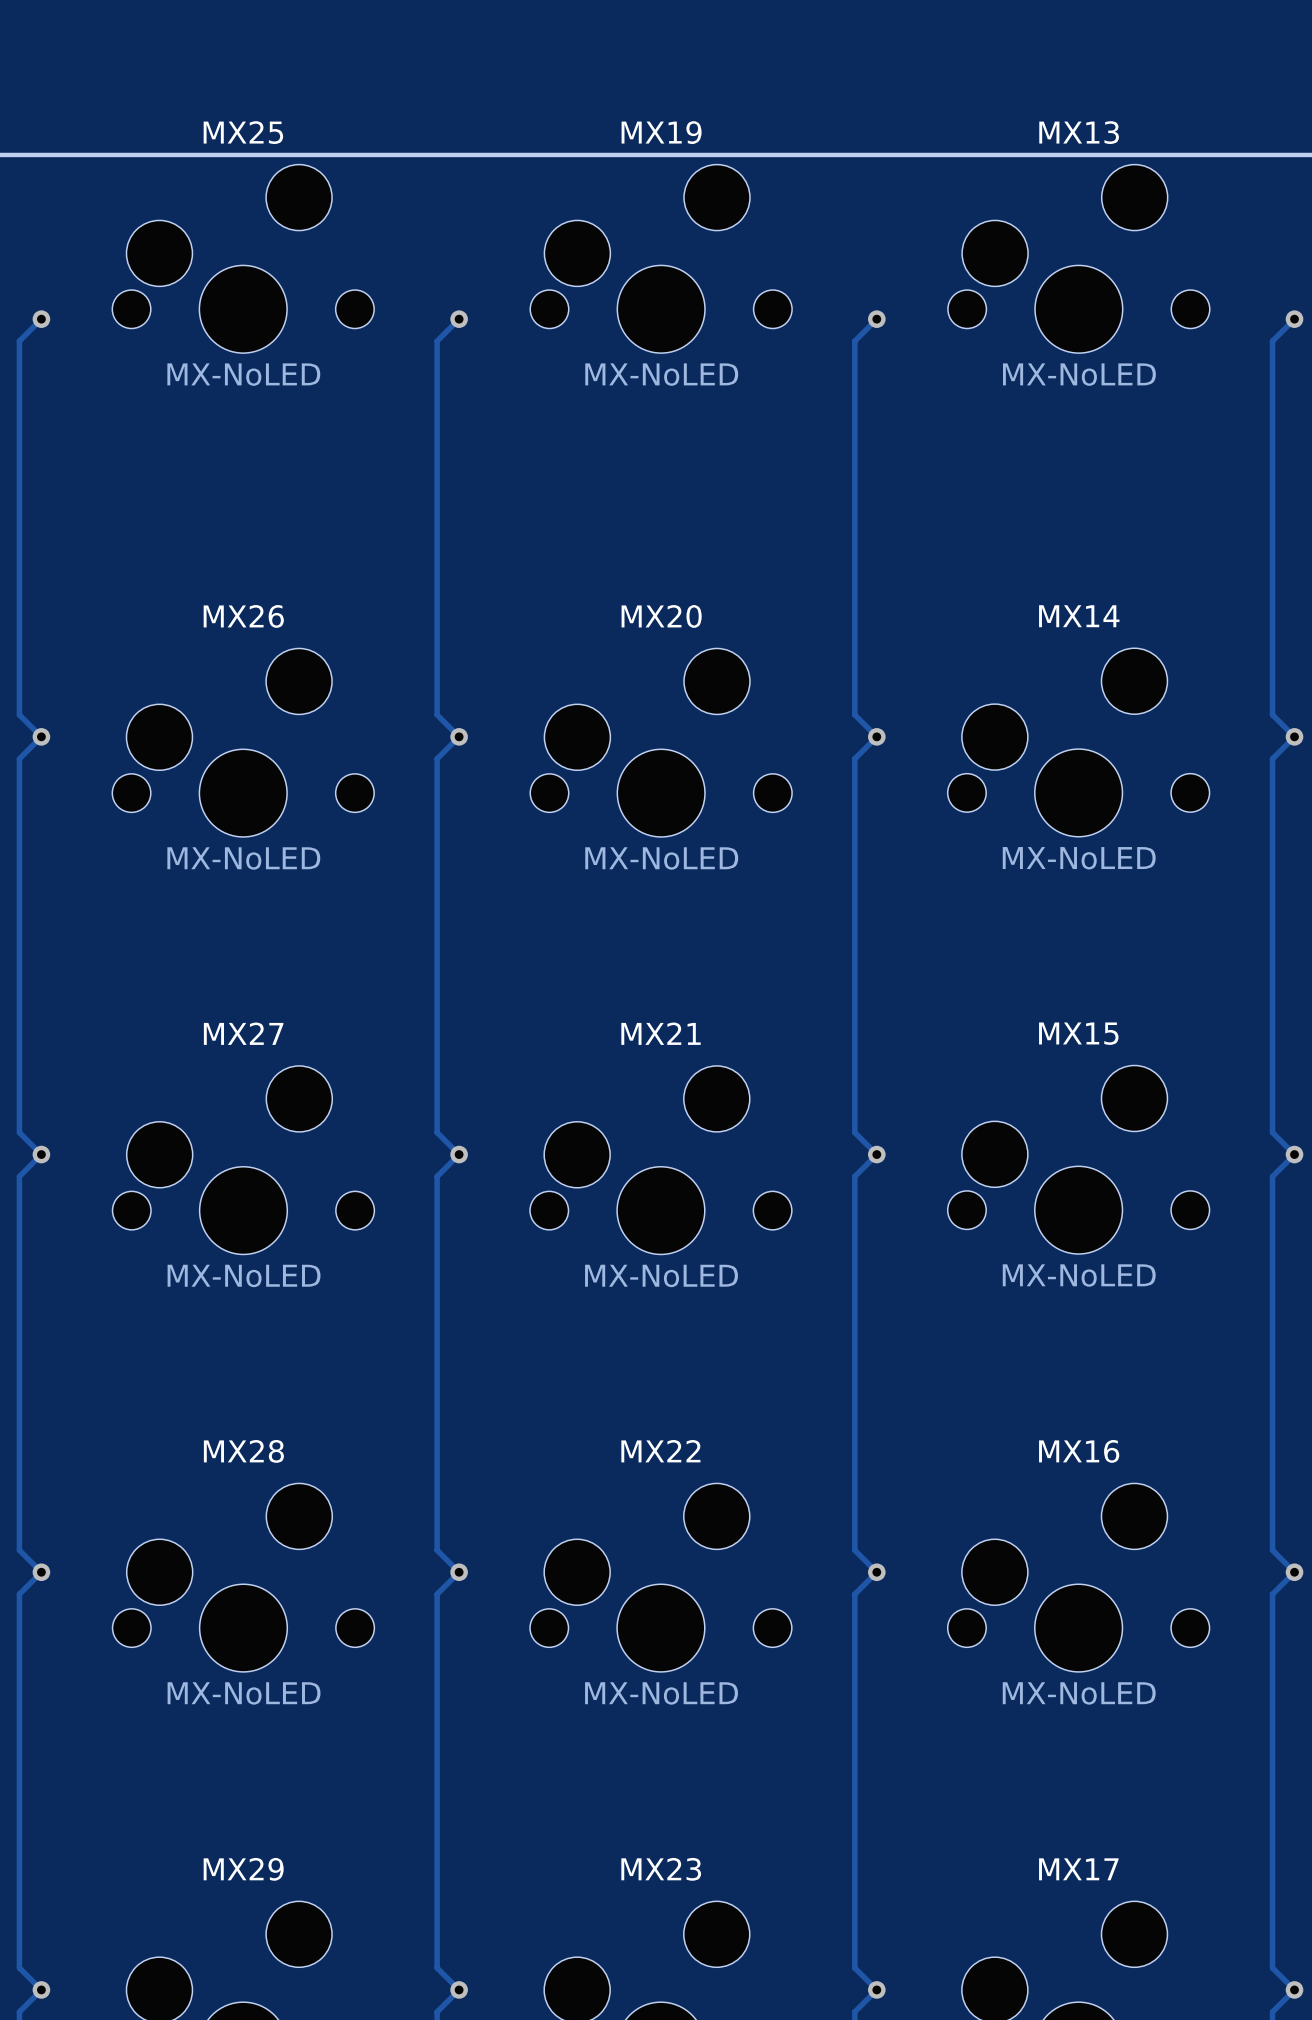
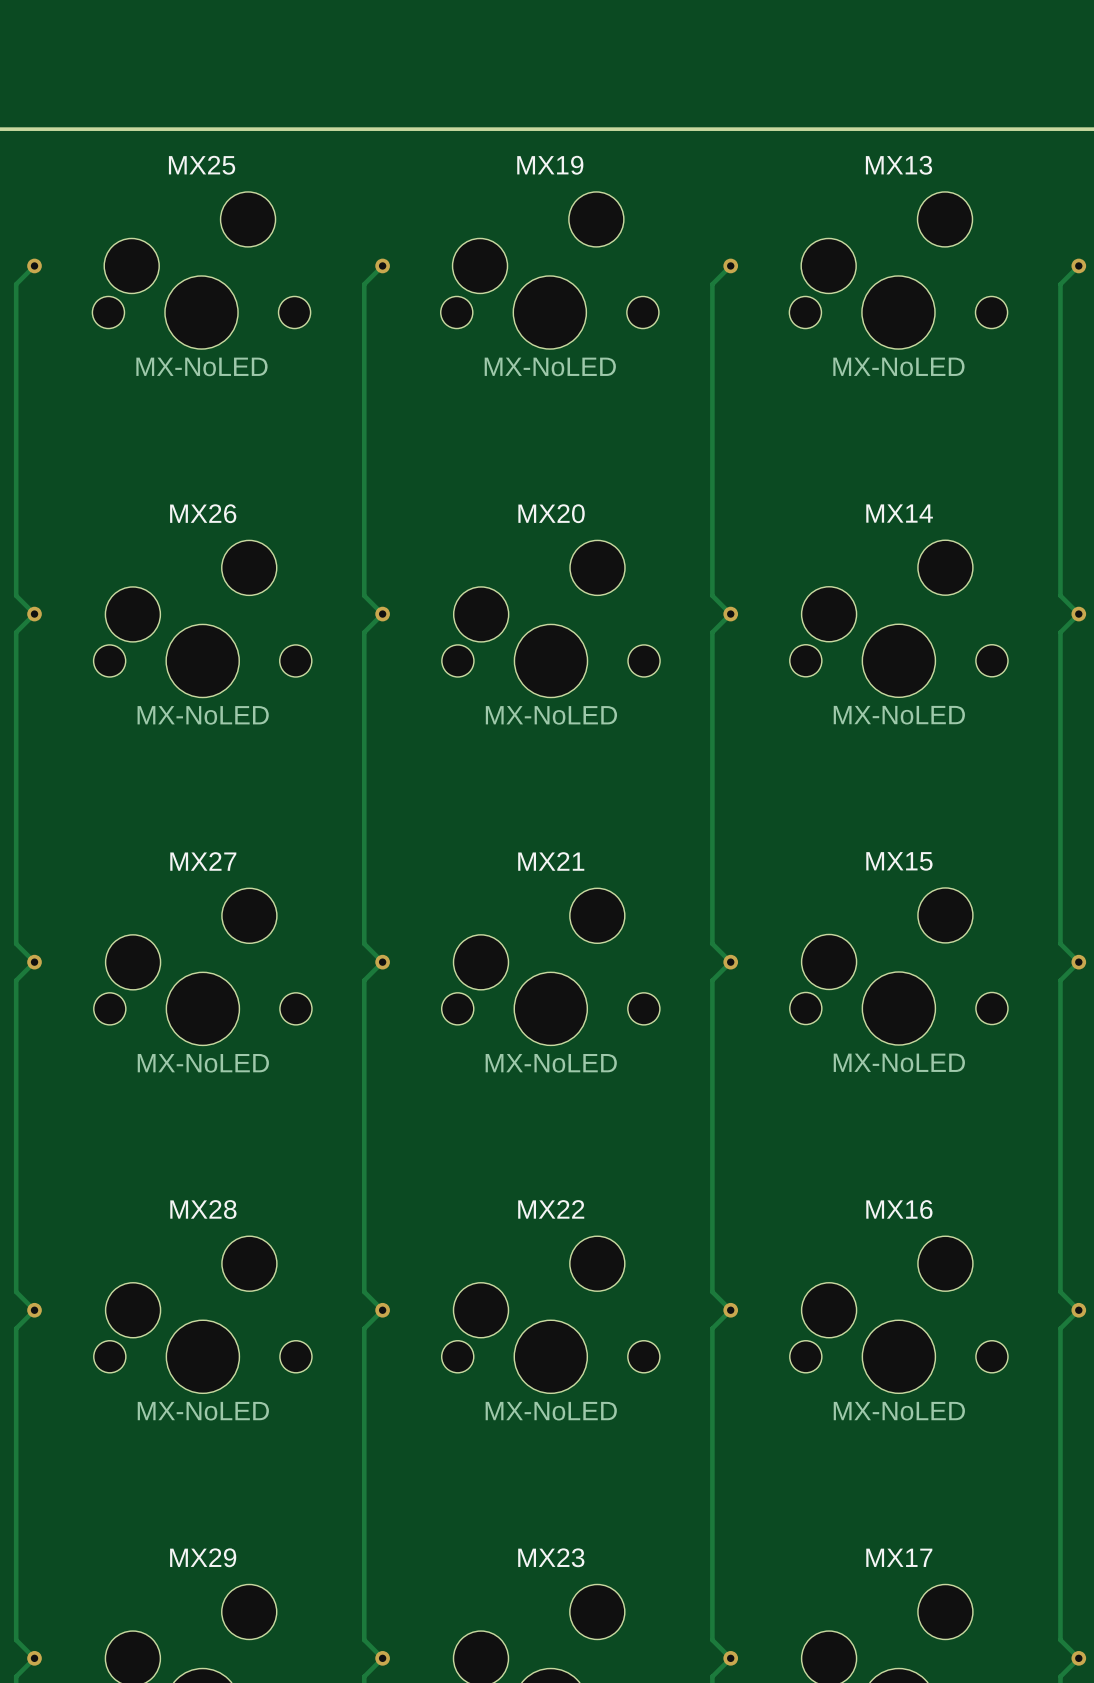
MX25 position: (243, 258) -> (201, 270)
MX19 position: (661, 258) -> (549, 270)
MX13 position: (1078, 258) -> (898, 270)

